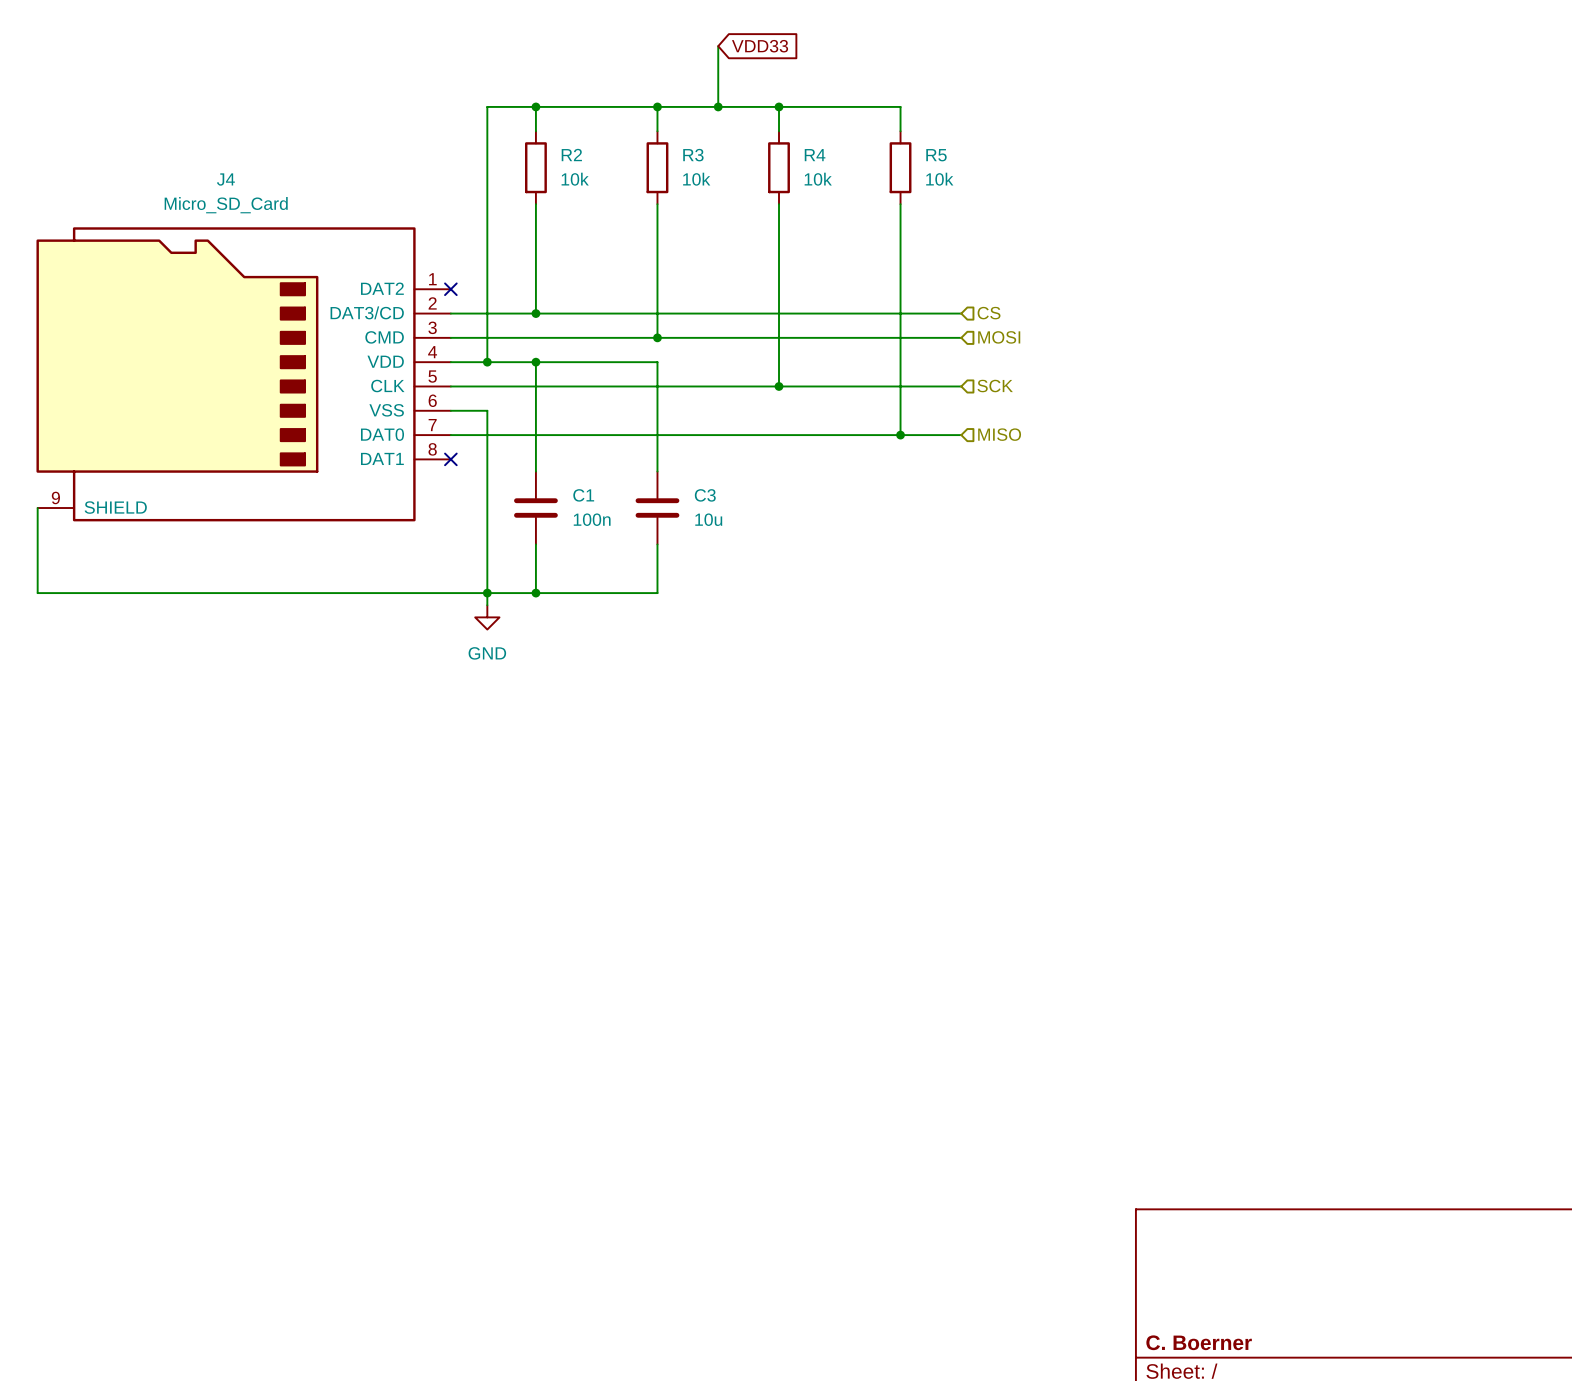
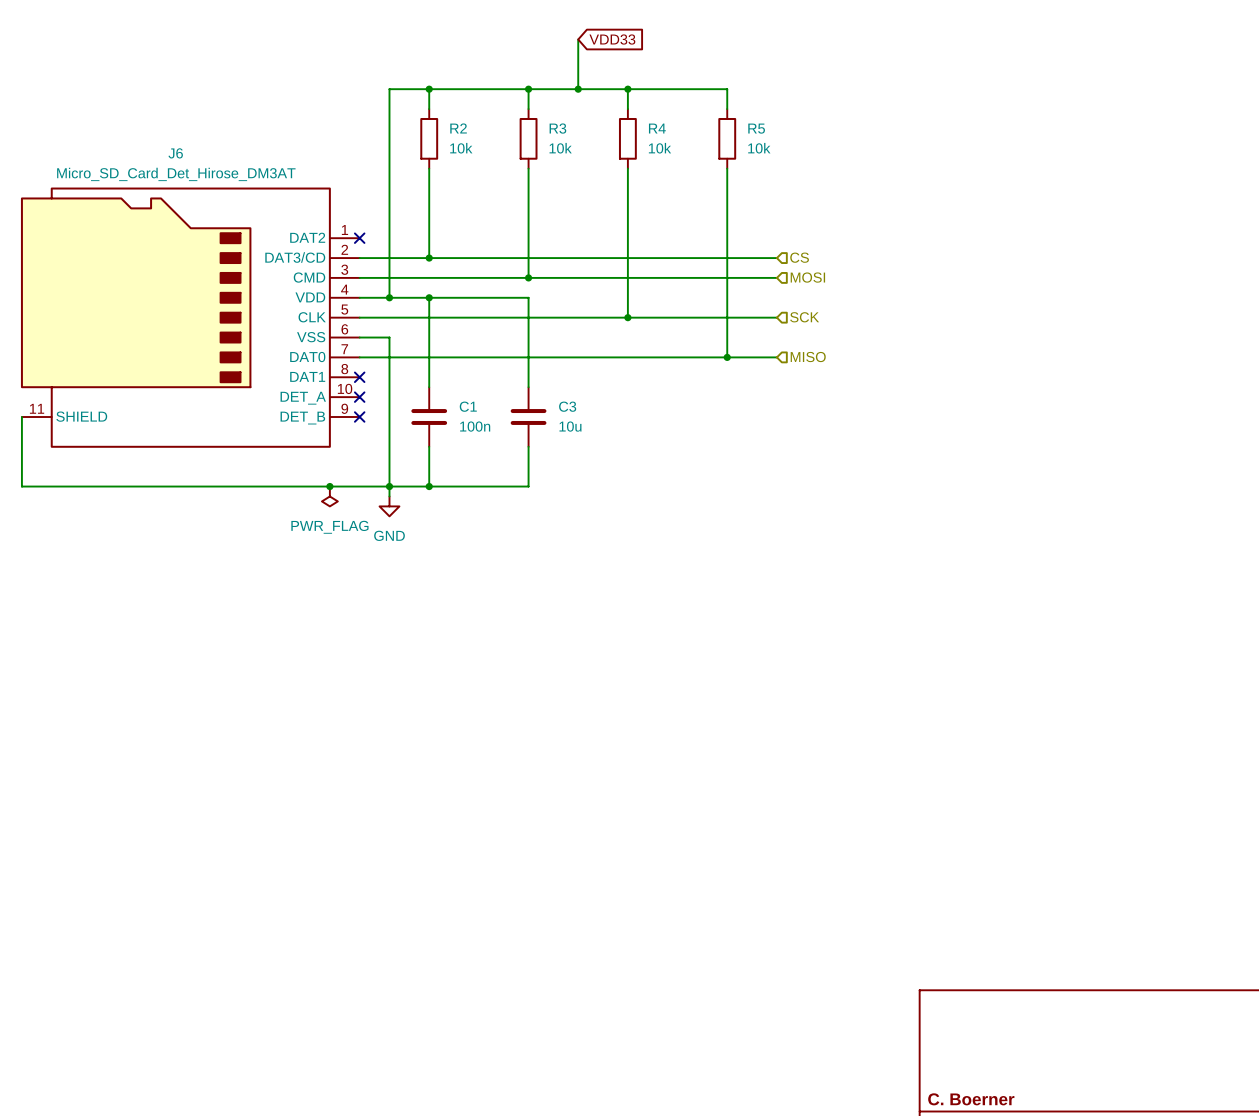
J4: Micro_SD_Card (243, 374) -> none
J6: none -> Micro_SD_Card_Det_Hirose_DM3AT (190, 317)
no-connect mark: none -> (359, 397)
no-connect mark: none -> (359, 417)
junction: none -> (329, 486)
power symbol: none -> PWR_FLAG (329, 496)

